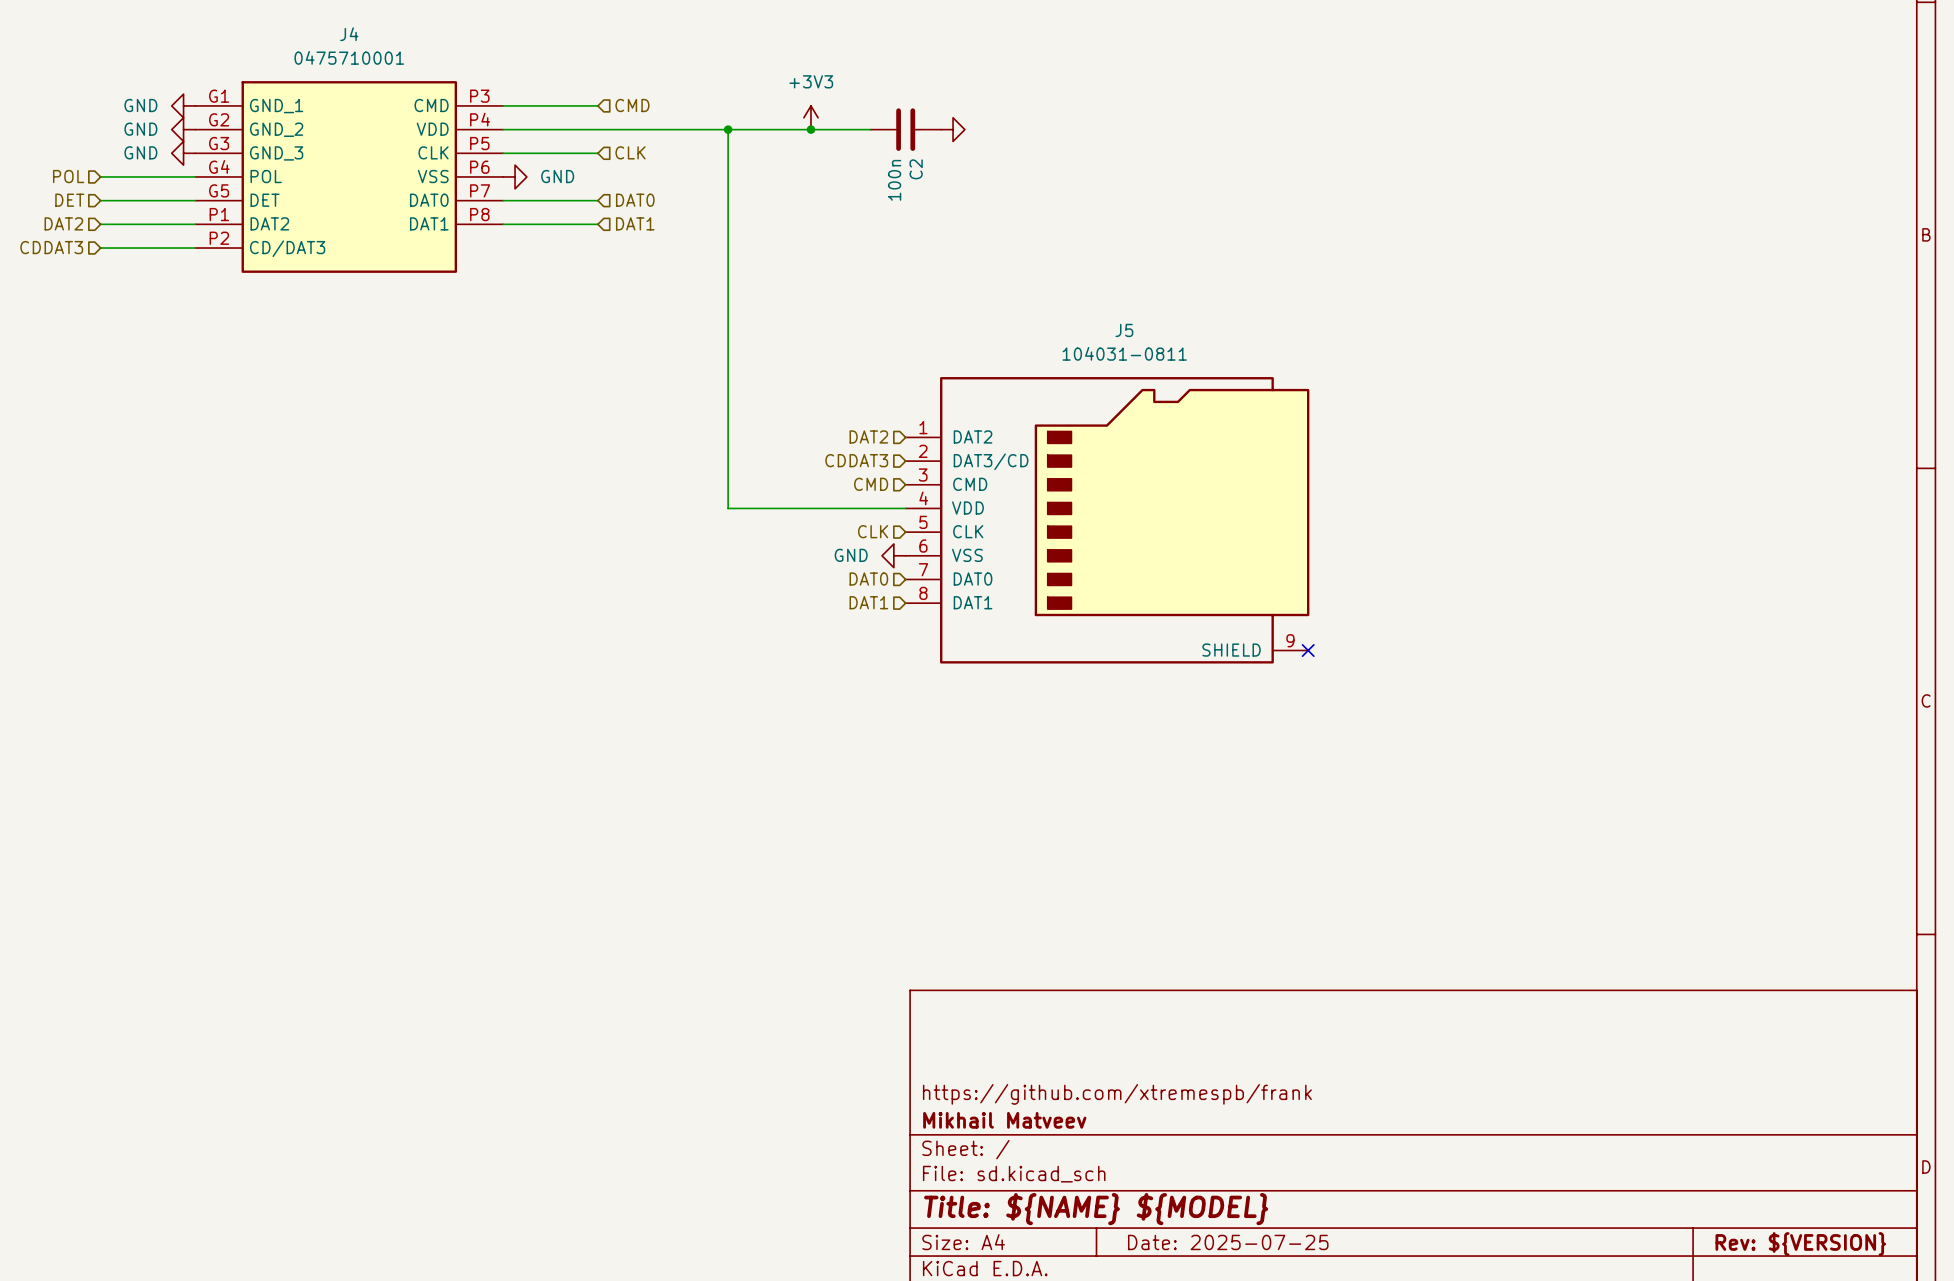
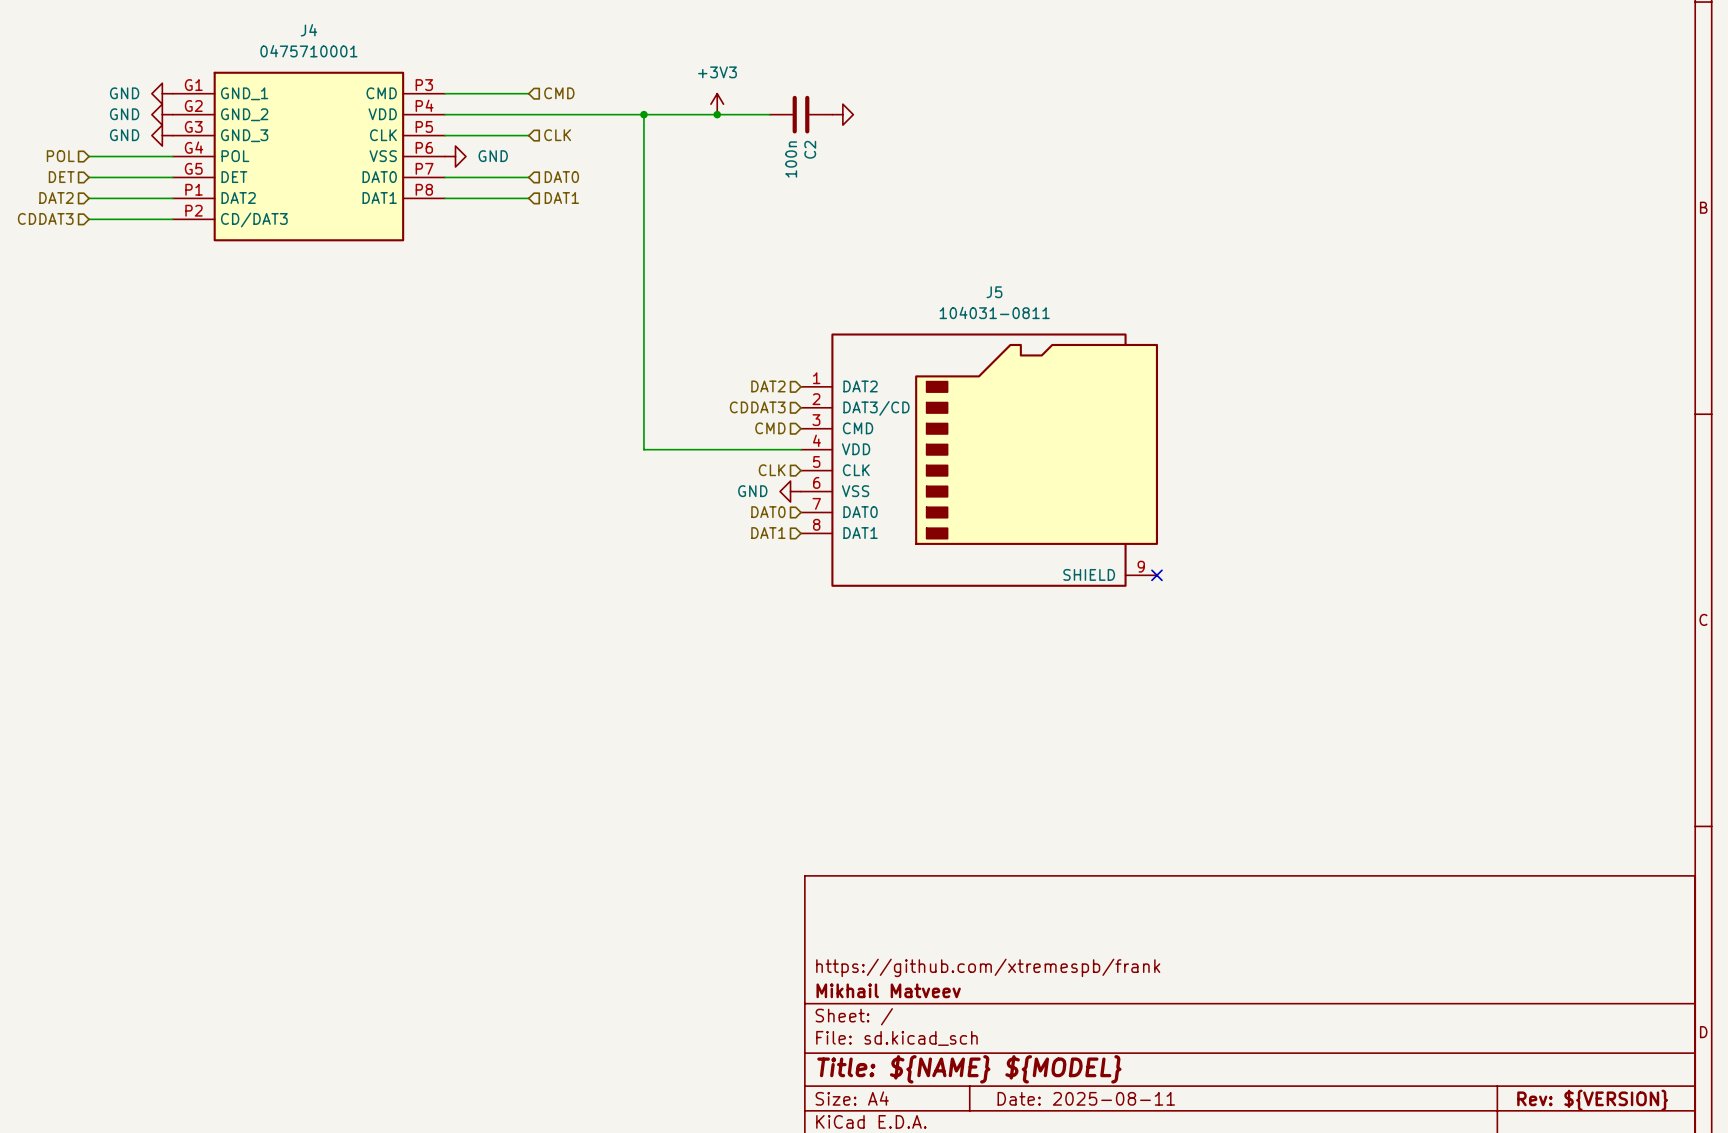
title block: Date: 2025-07-25 (1228, 1242) -> Date: 2025-08-11 (1086, 1098)

